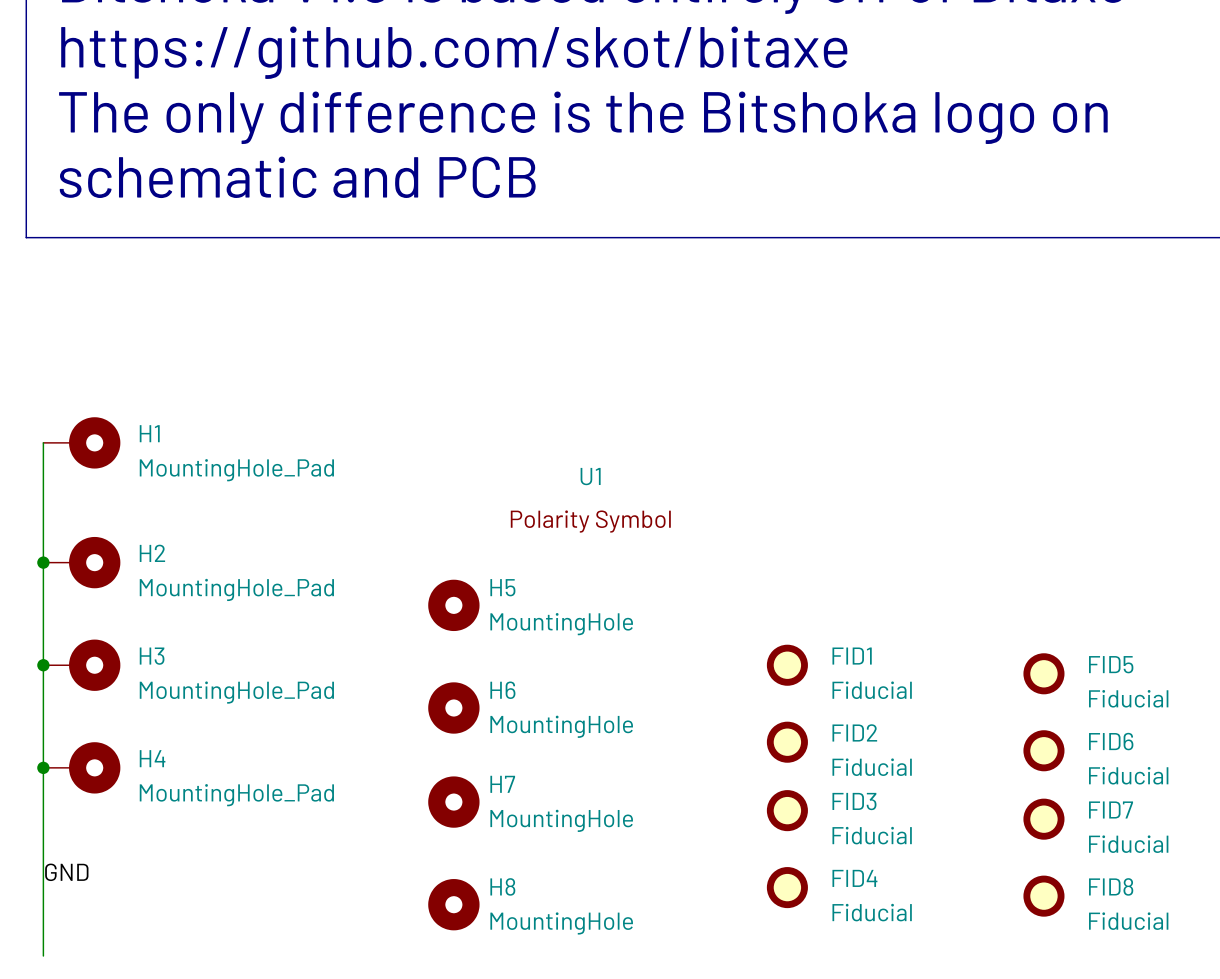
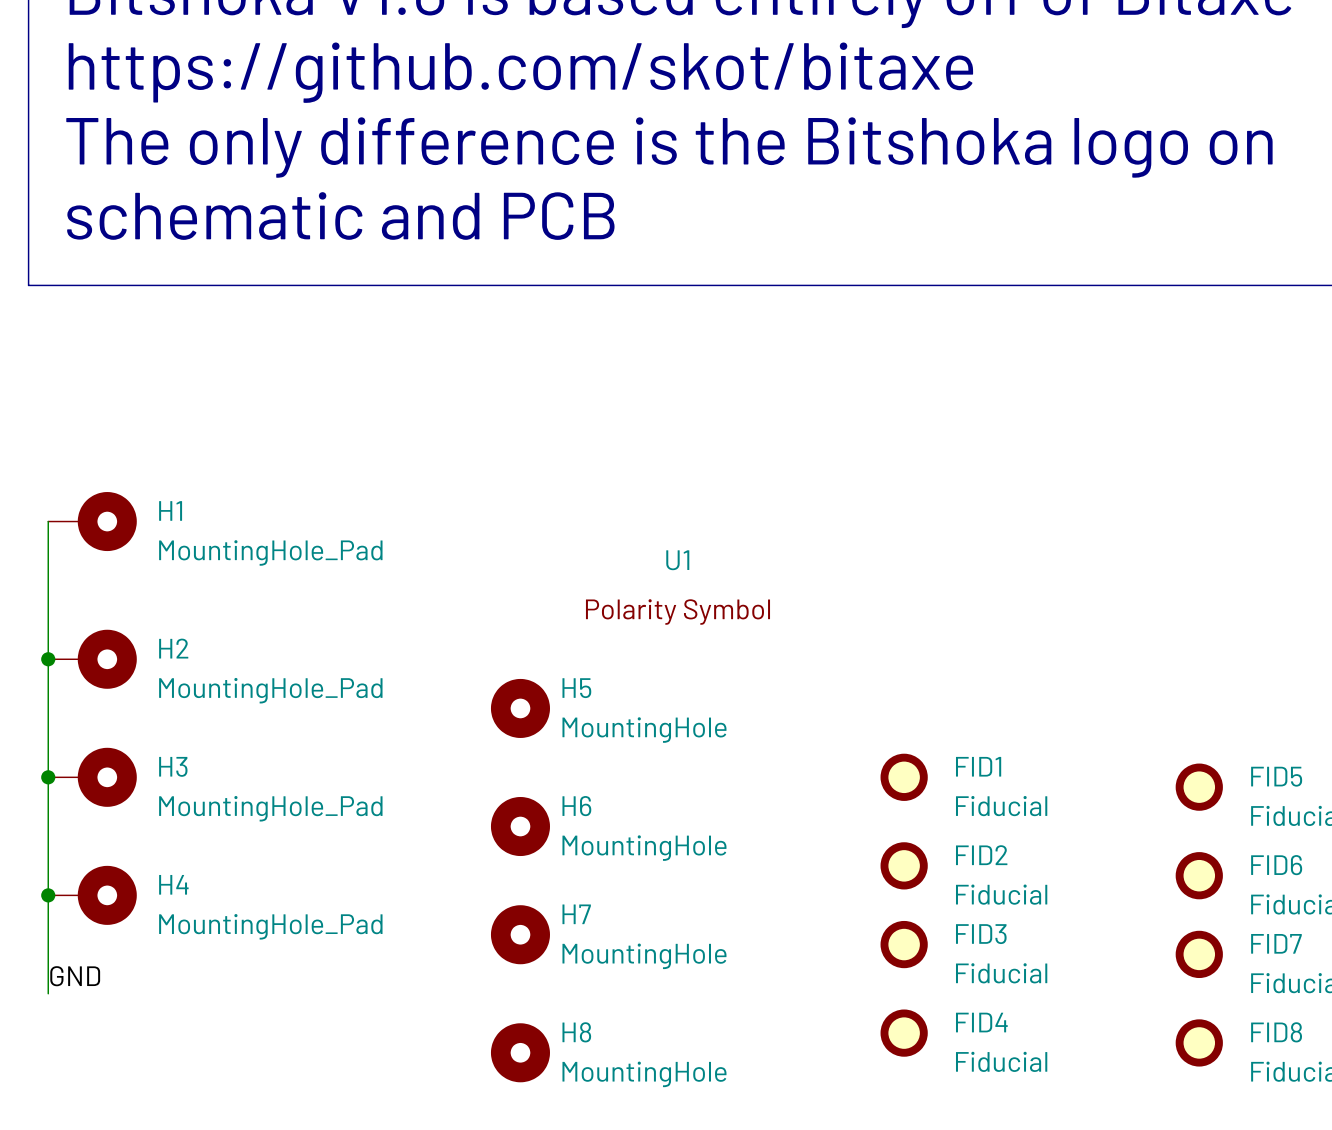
wire: (43, 853) (43, 956) -> none
label position: GND (66, 872) -> GND (75, 976)

